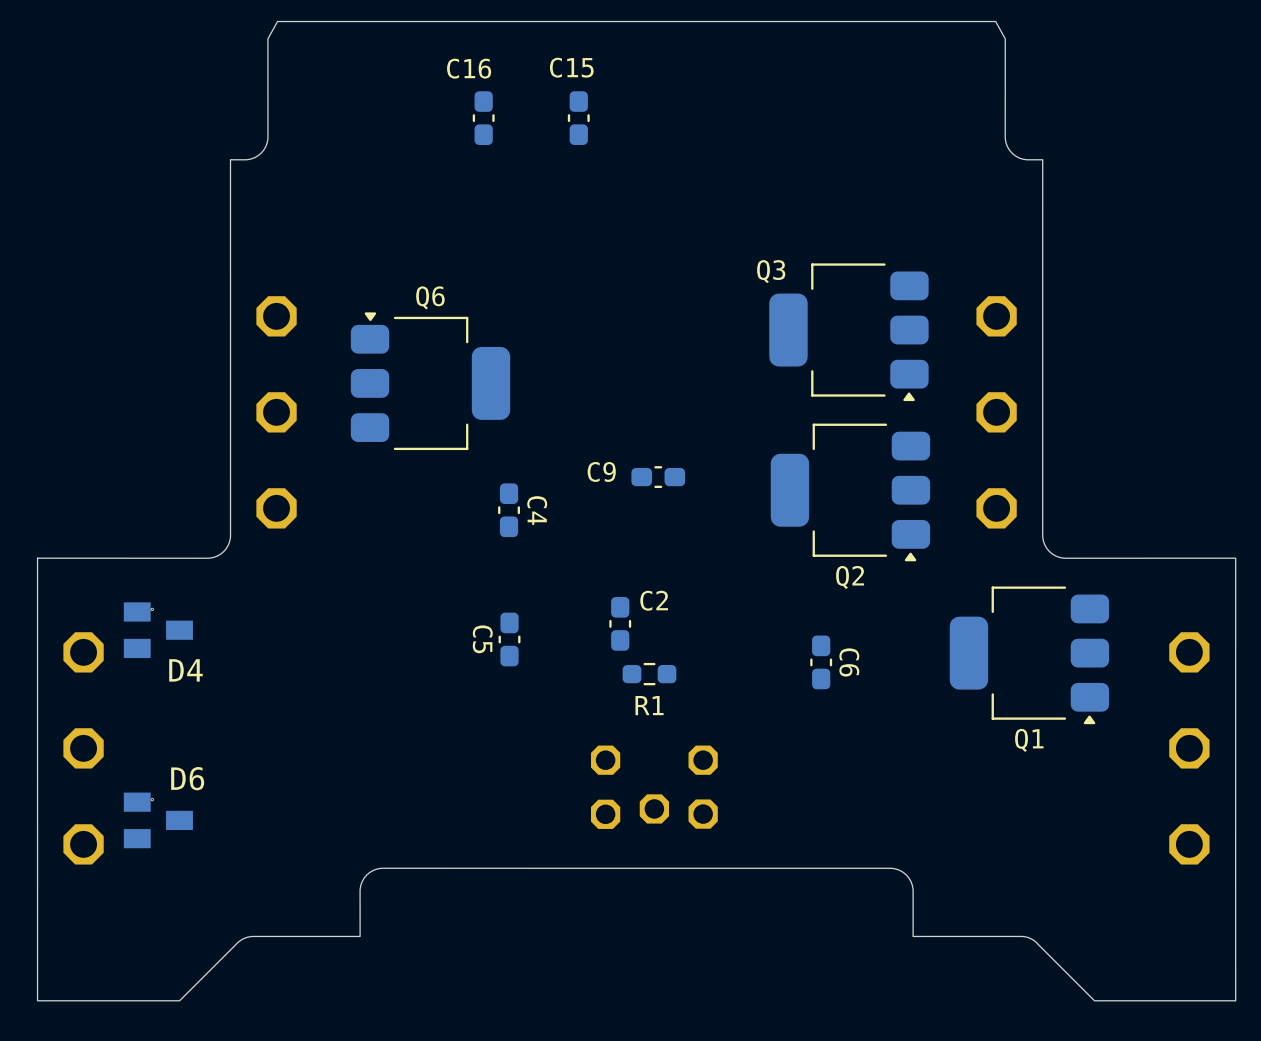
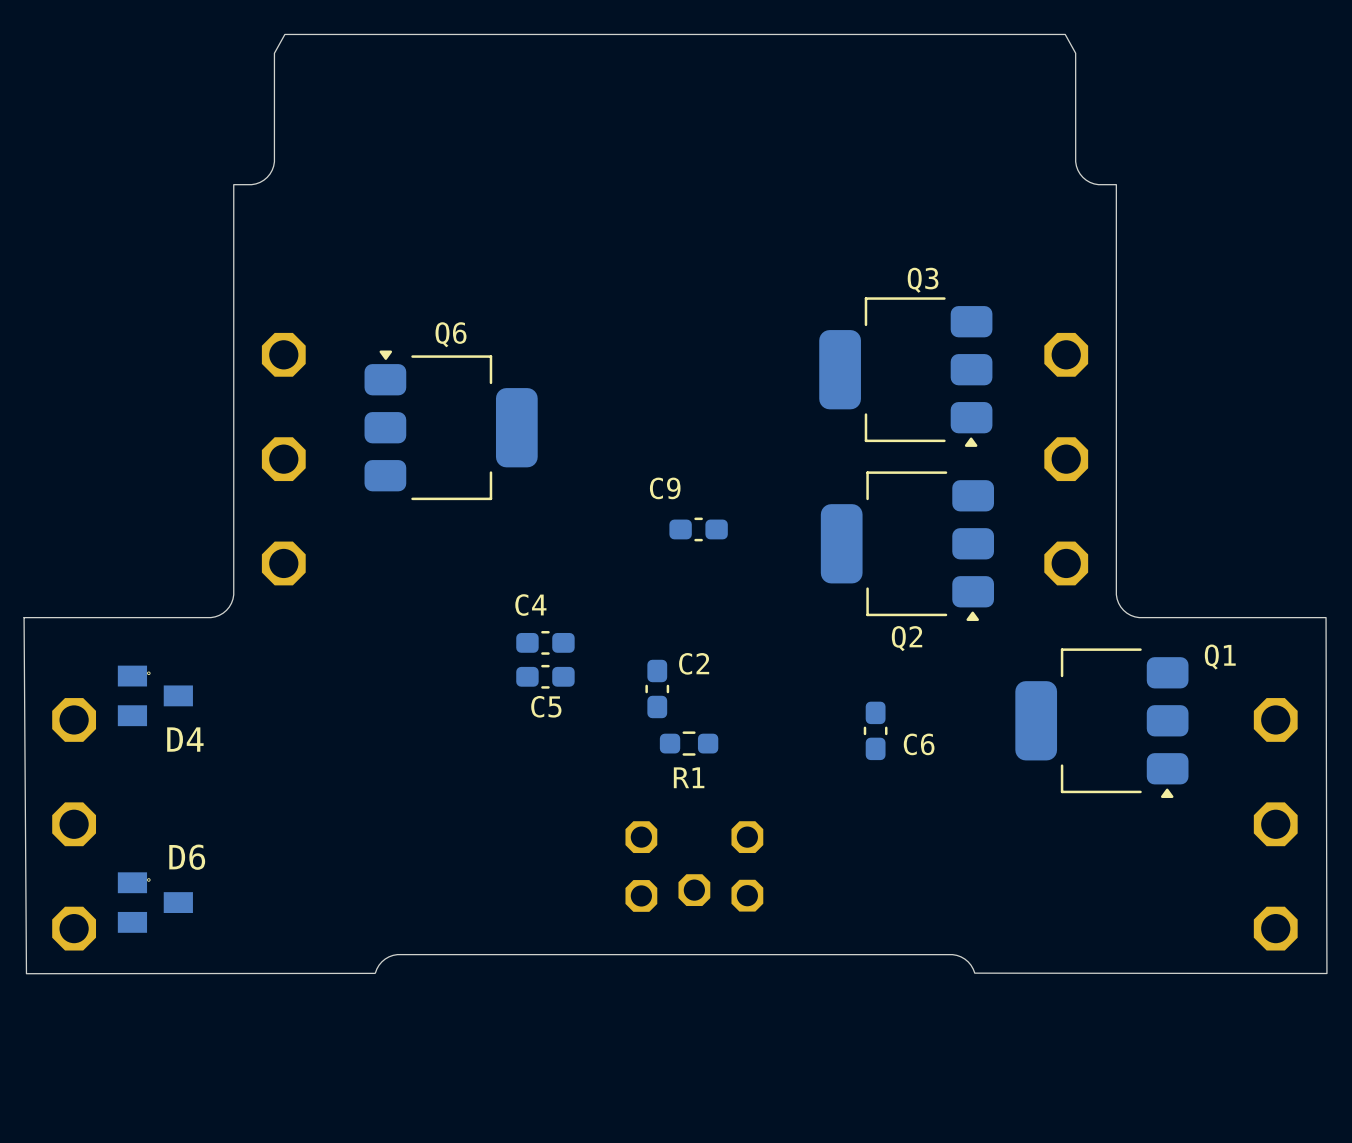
drawing: [37, 21, 1236, 1001] -> none
drawing: none -> [24, 34, 1327, 974]
C16: (483, 118) -> none
C15: (578, 118) -> none
Q3 name position: Q3 (771, 271) -> Q3 (923, 280)
C9 name position: C9 (601, 471) -> C9 (665, 488)
C4 rotation: 0° (509, 510) -> 90° clockwise (545, 642)
C4 position: (509, 510) -> (545, 642)
C4 name position: C4 (537, 510) -> C4 (530, 605)
C5 name position: C5 (482, 639) -> C5 (546, 706)
C5 rotation: 0° (509, 639) -> 90° clockwise (545, 676)
C6 name rotation: 0° (849, 662) -> 90° counterclockwise (919, 744)
Q1 name position: Q1 (1029, 740) -> Q1 (1220, 657)

